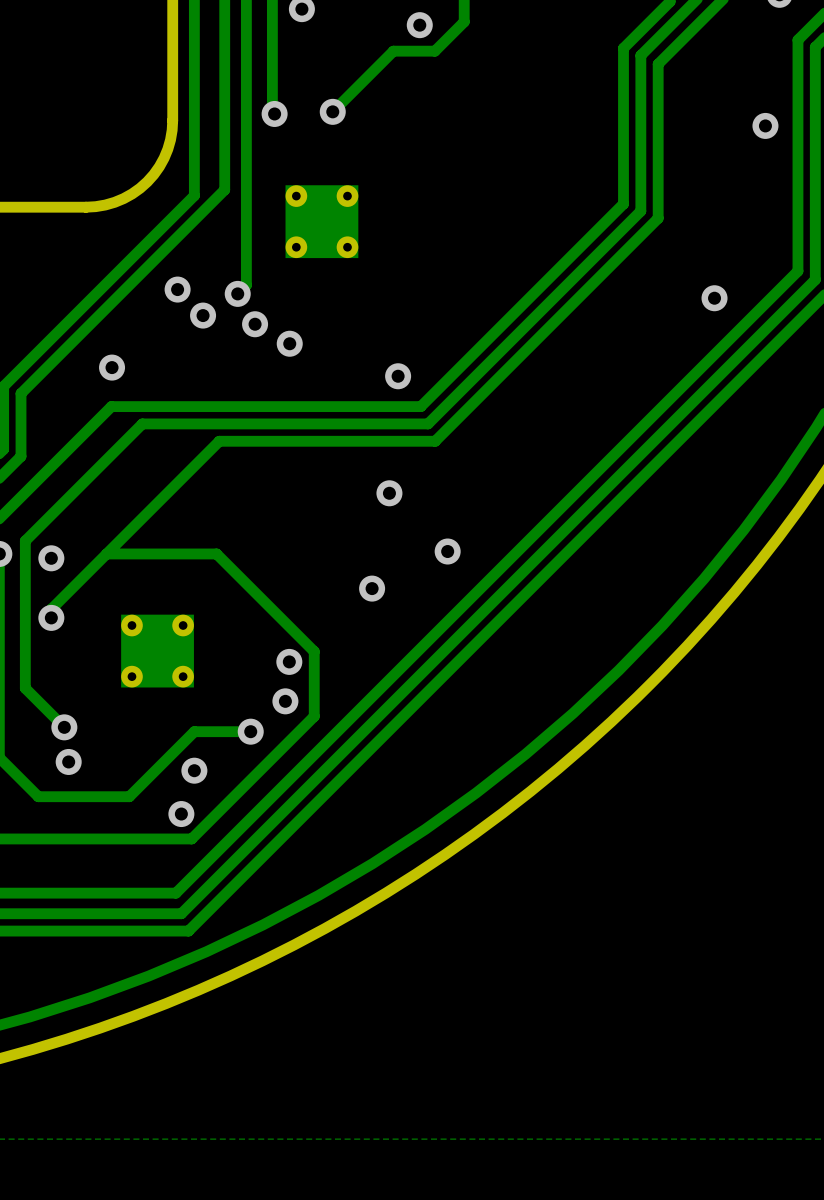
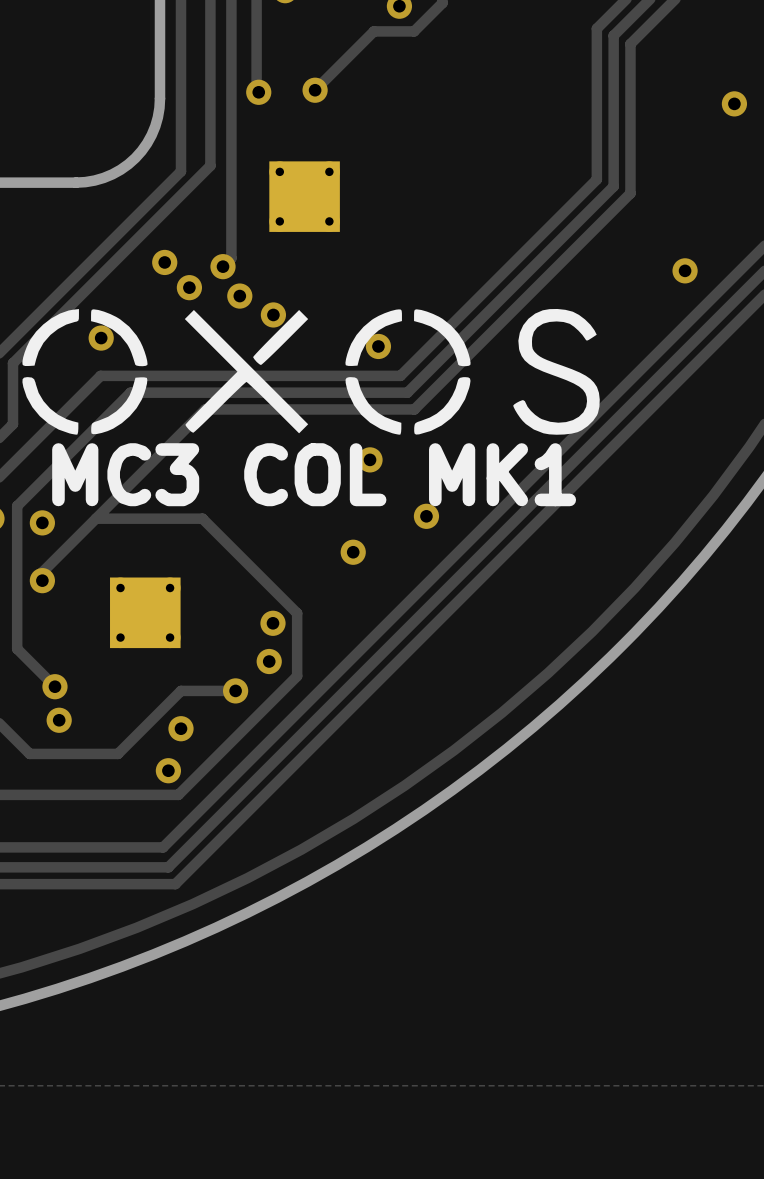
drawing: none -> [22, 308, 600, 435]
text: none -> MC3 COL MK1 (314, 474)

